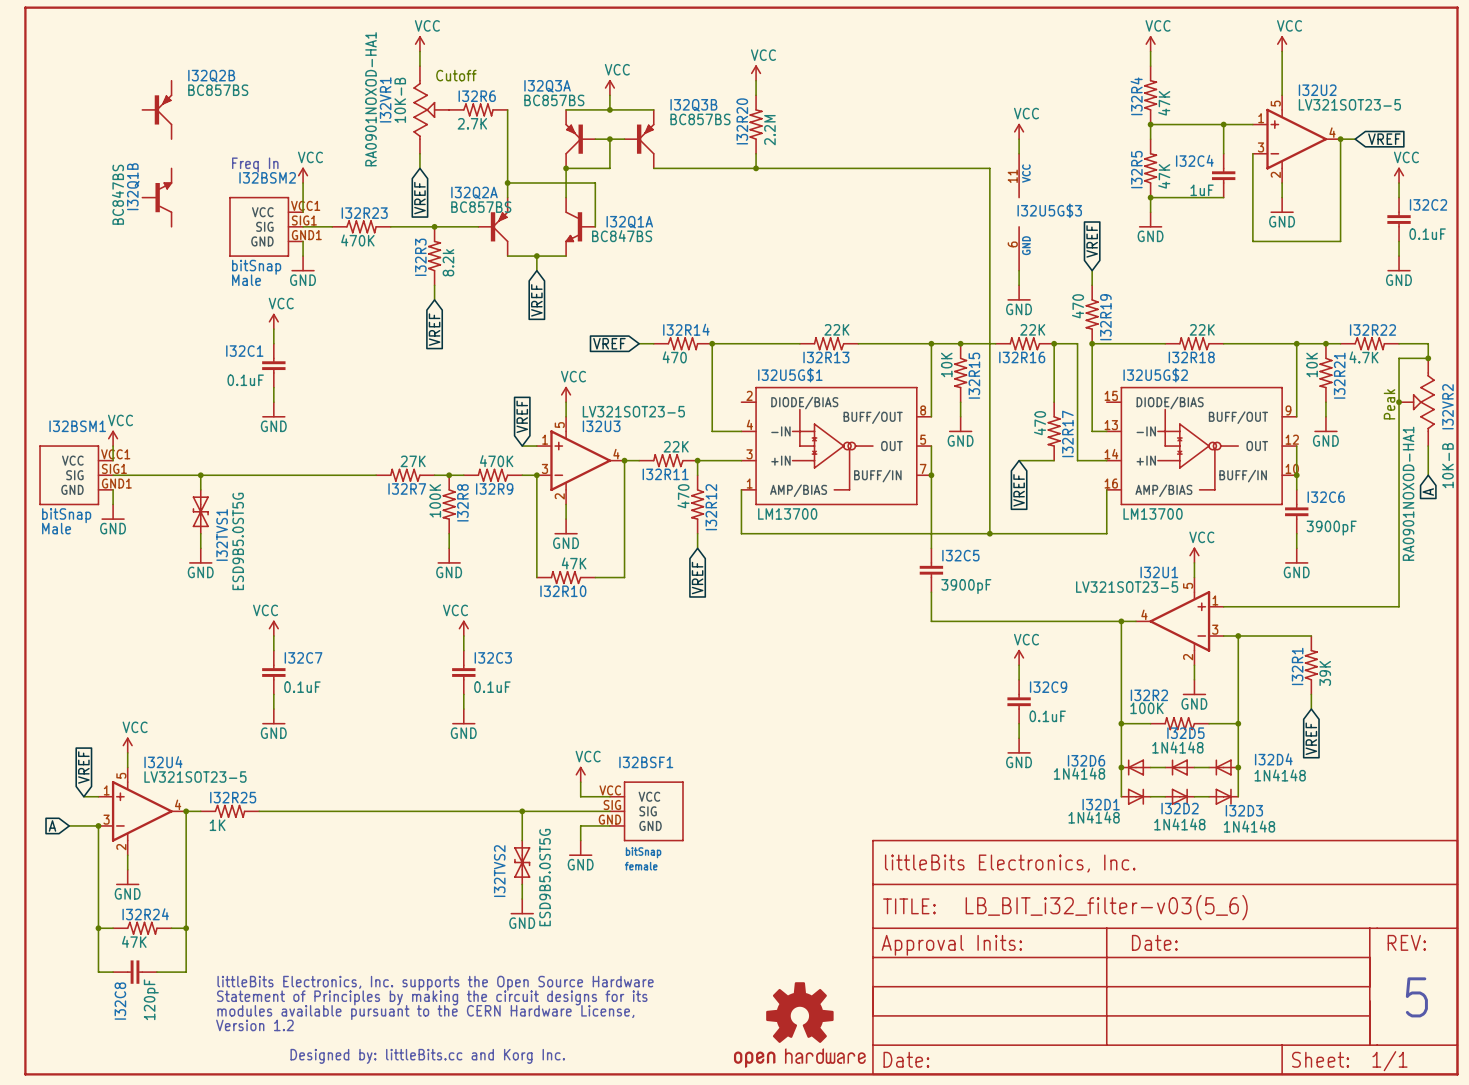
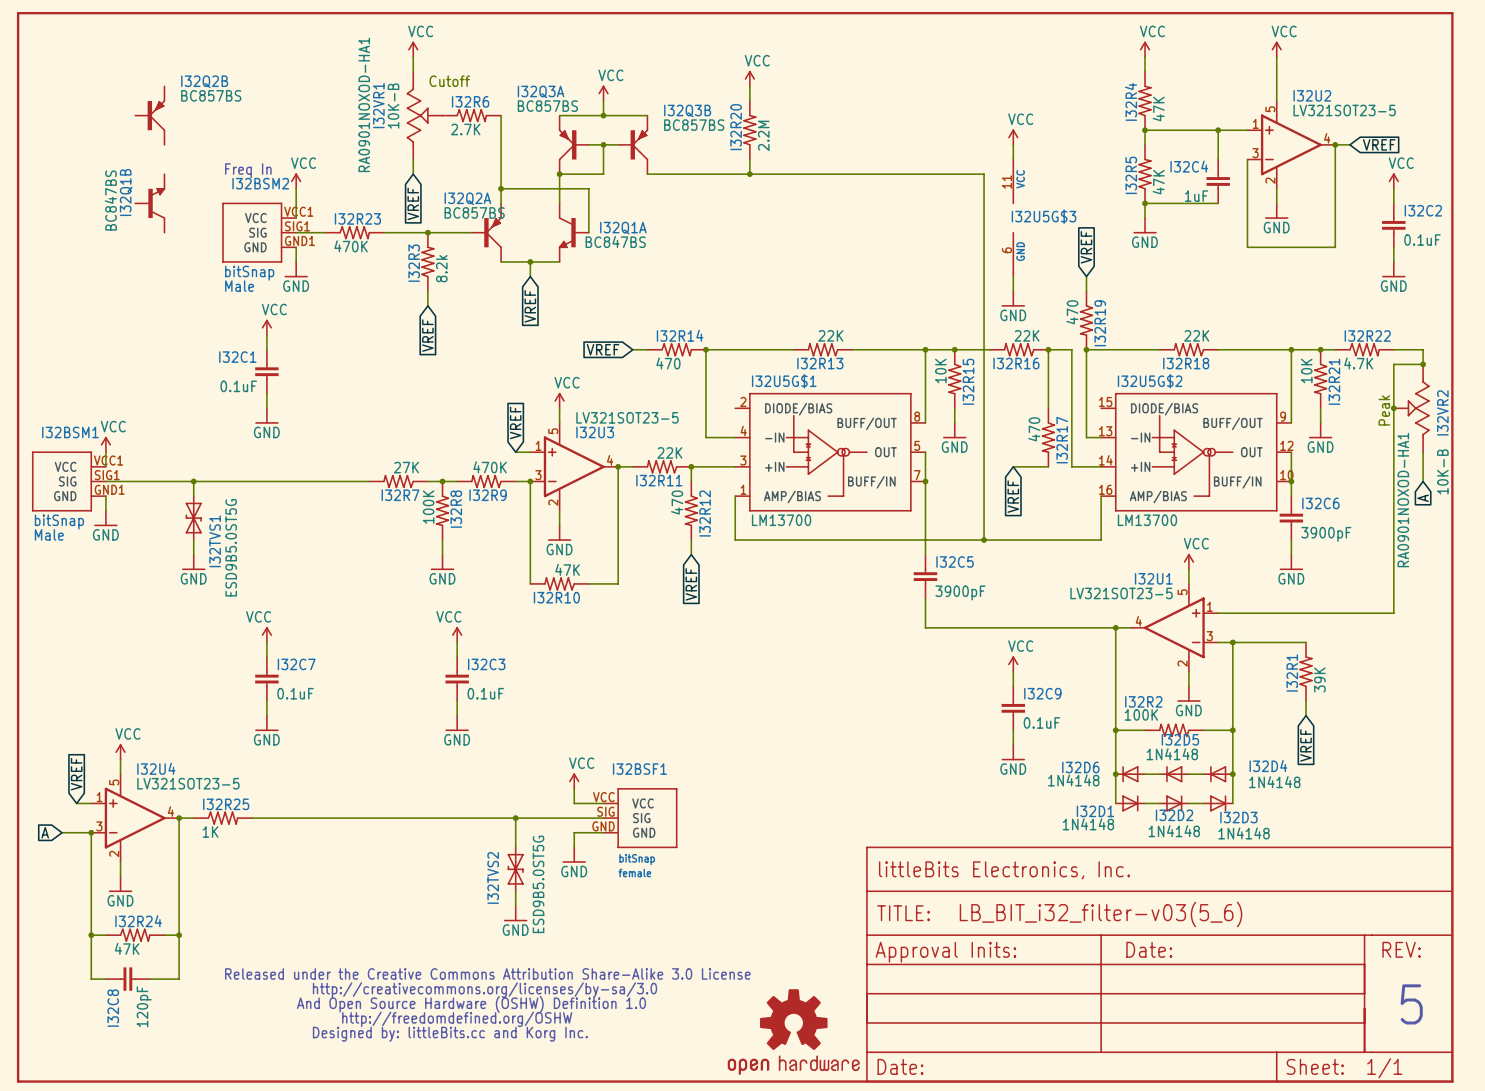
part: none -> (487, 1004)
part: (434, 1019) -> none

